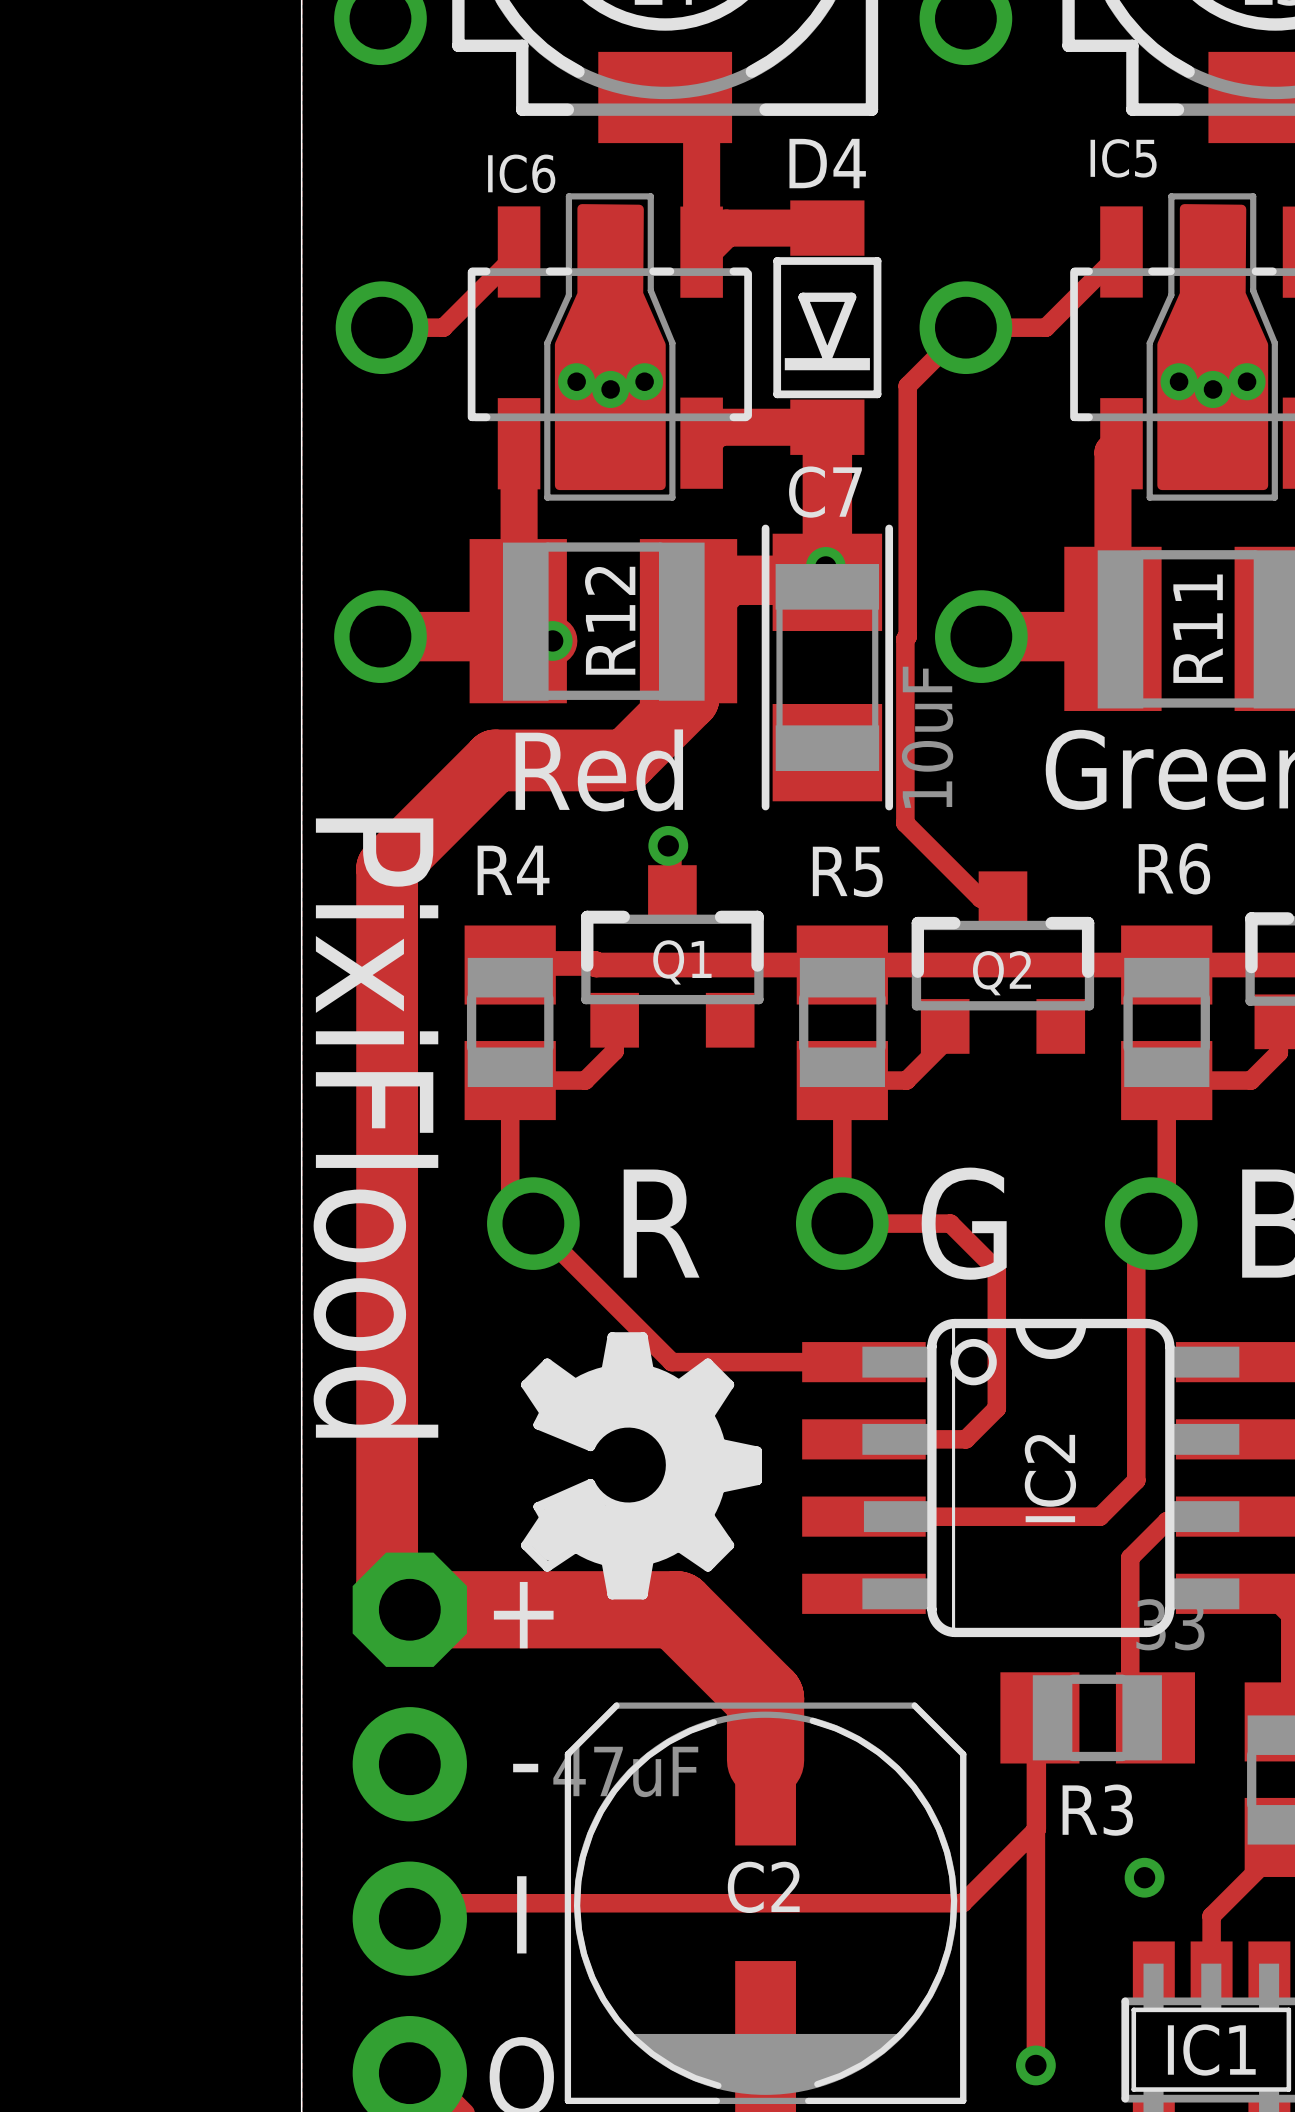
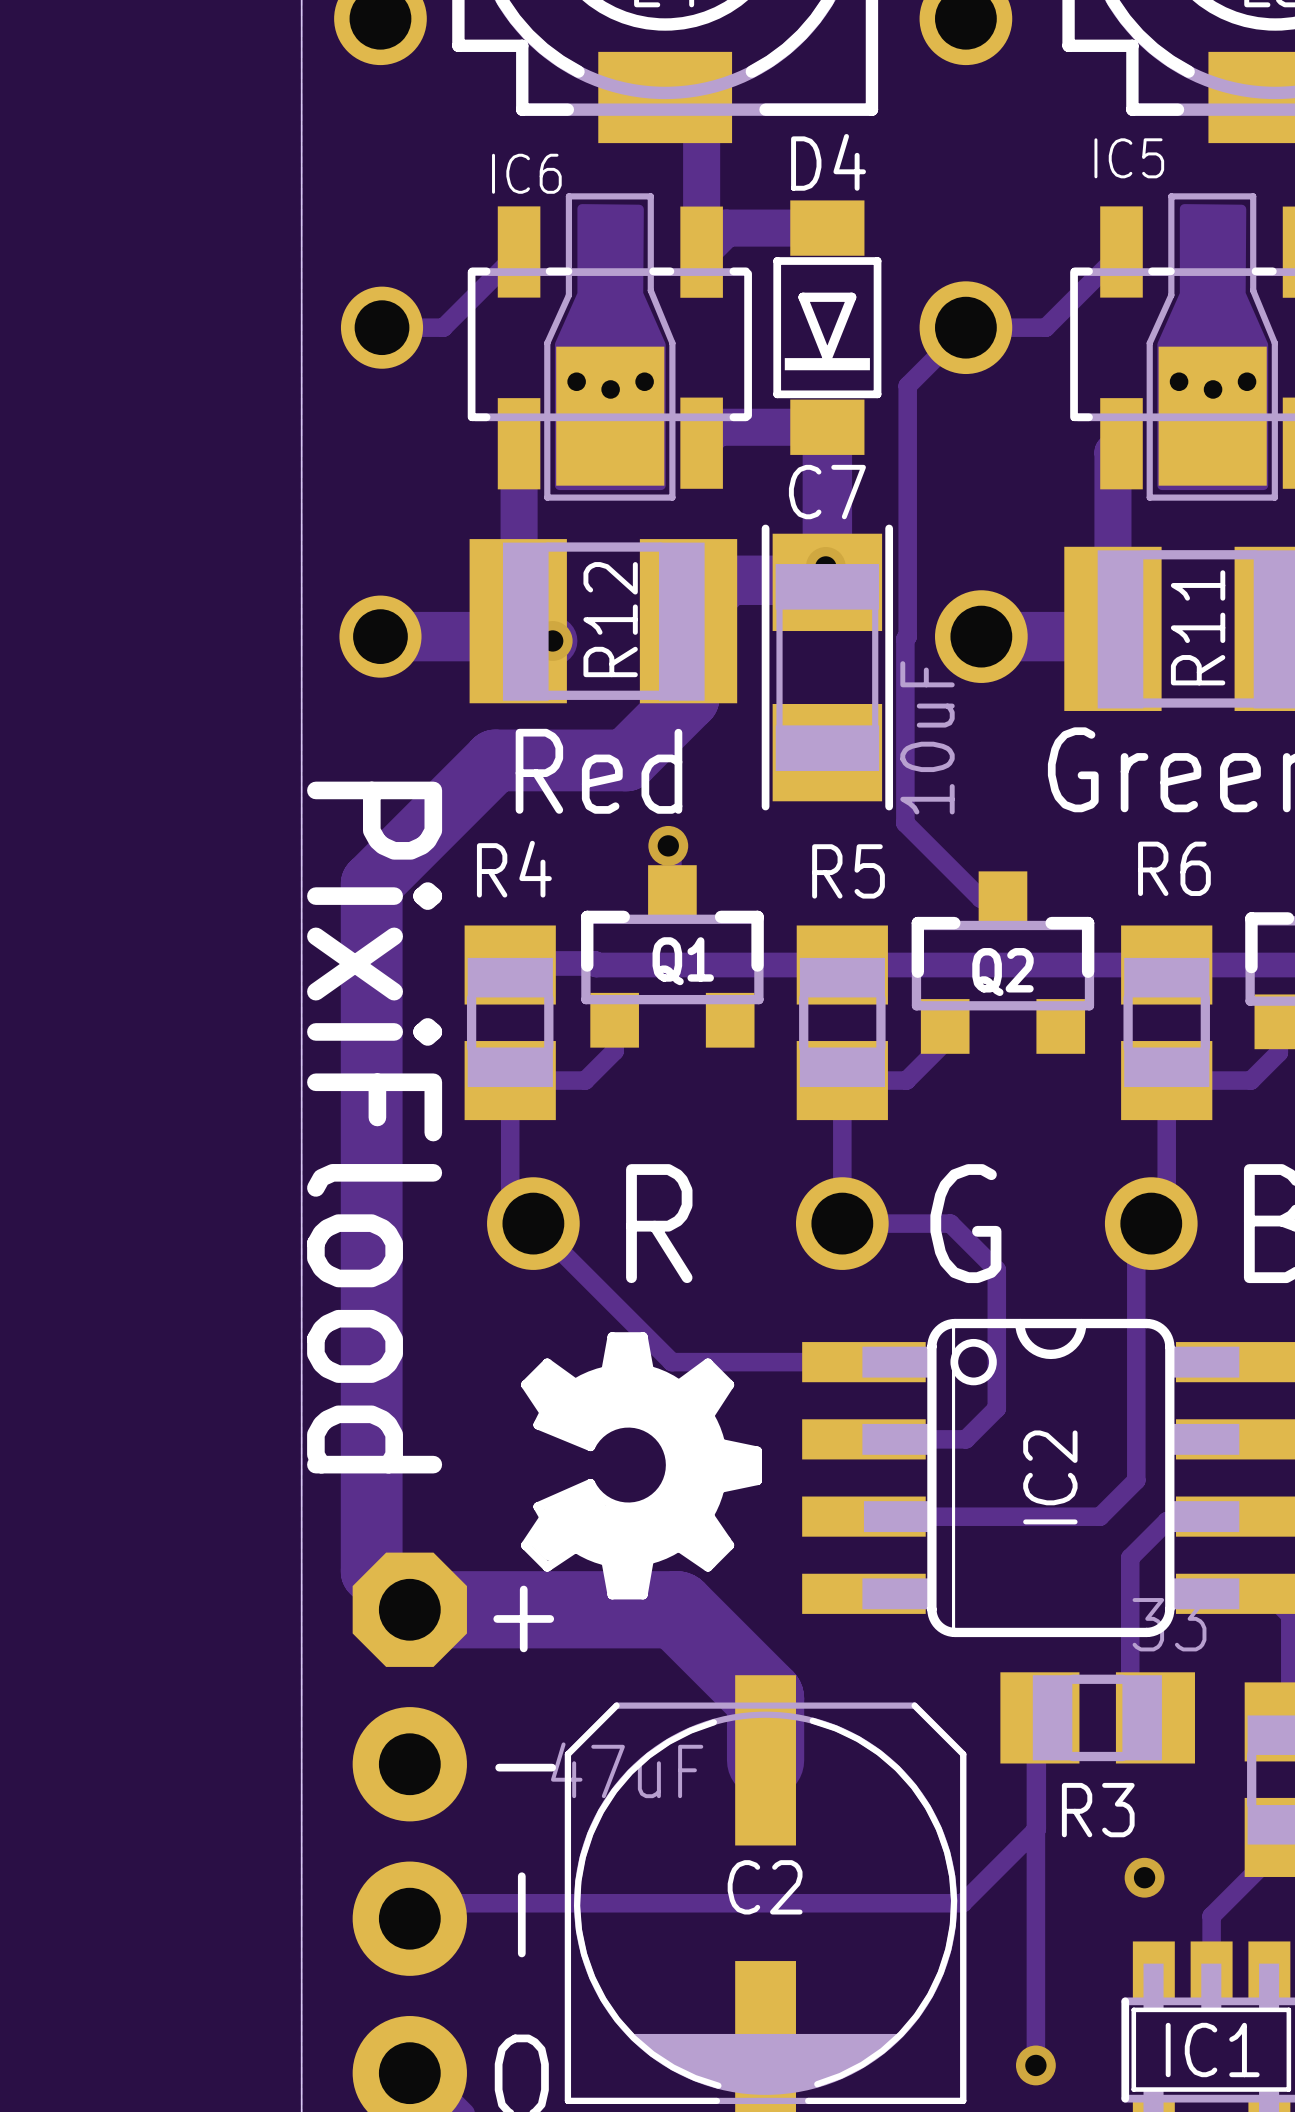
part footprint: [335, 281, 429, 375] -> [340, 286, 424, 369]
part footprint: [334, 590, 427, 683] -> [339, 595, 422, 678]
track: (387, 868) (387, 1587) -> (387, 868) (371, 883) (371, 1571) (387, 1587)

